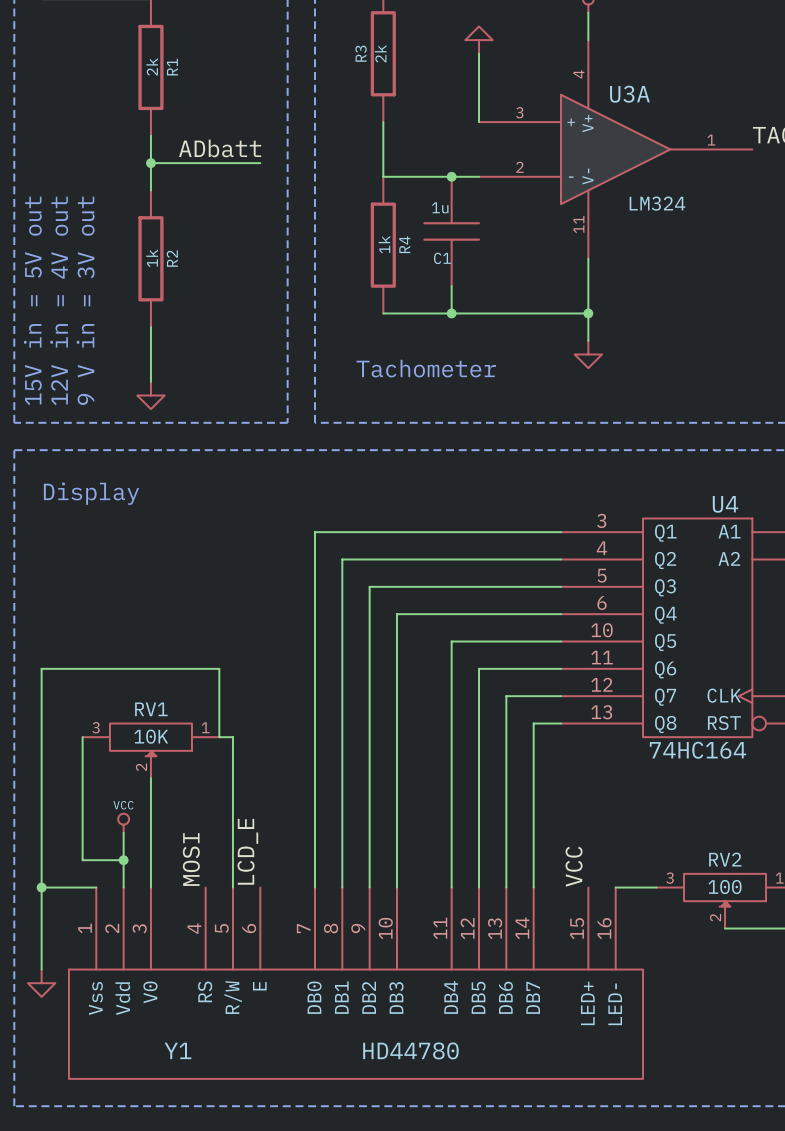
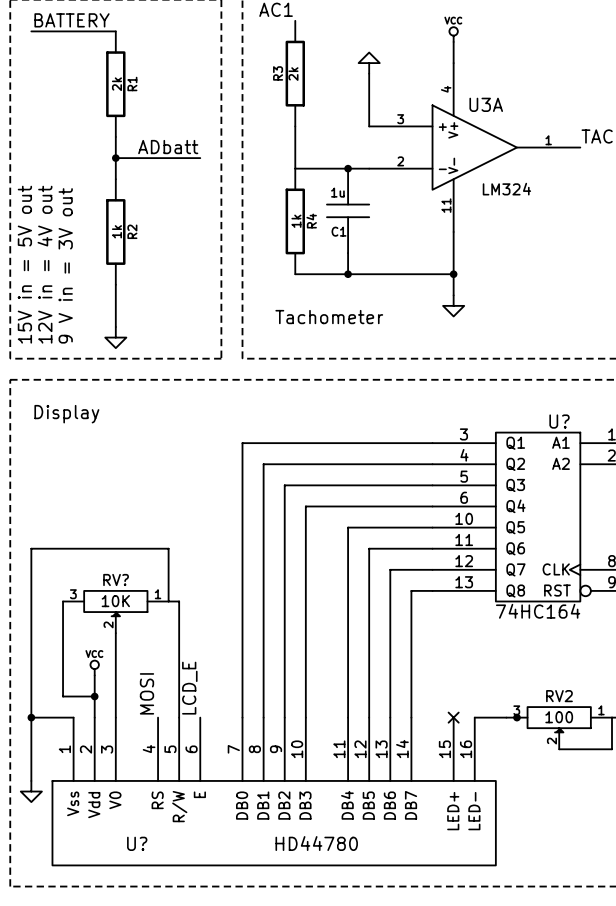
U4 name: U4 (725, 504) -> U? (559, 421)
RV1 name: RV1 (151, 709) -> RV? (116, 579)
label: VCC (574, 866) -> none
no-connect mark: none -> (453, 717)
junction: none -> (516, 717)
Y1 name: Y1 (177, 1050) -> U? (137, 843)

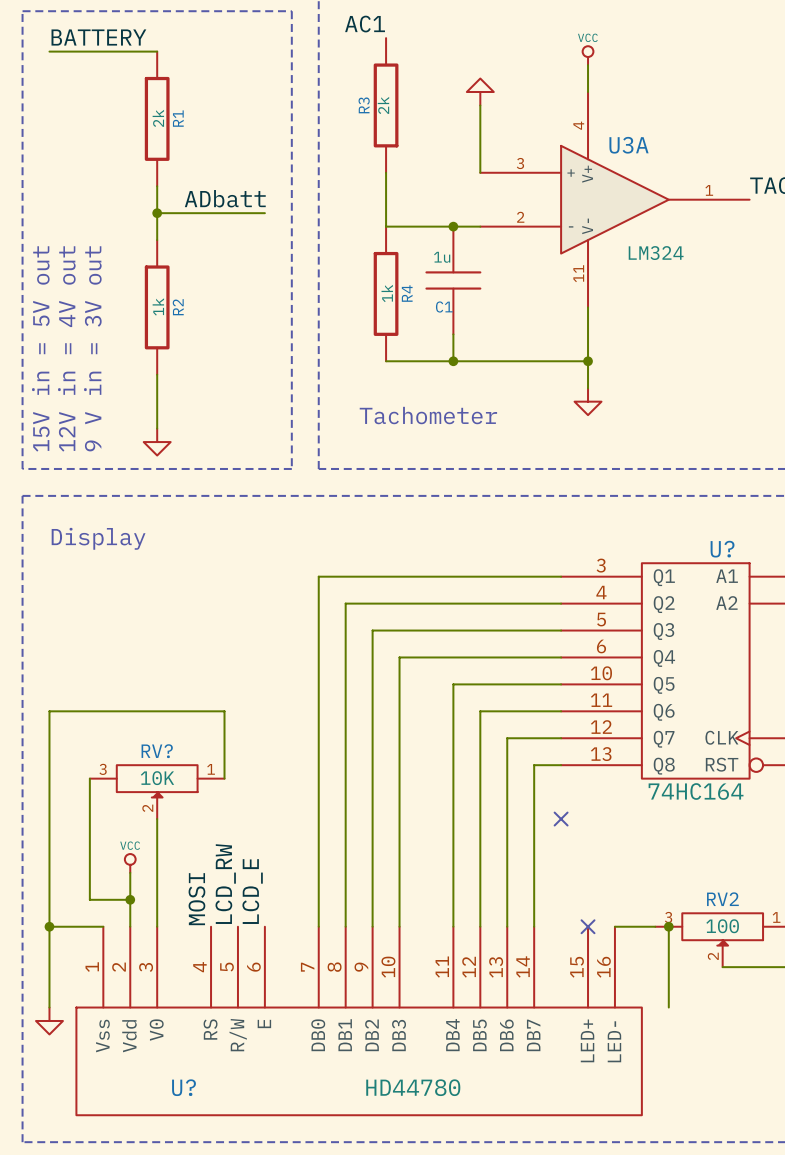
wire: (168, 601) (179, 601) (179, 717) -> none
no-connect mark: none -> (561, 819)
label: none -> LCD_RW (225, 884)
wire: none -> (668, 926) (668, 1007)

